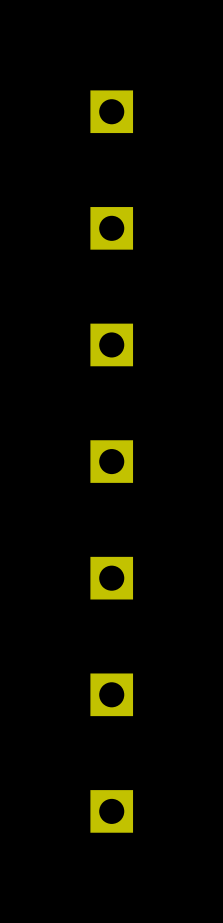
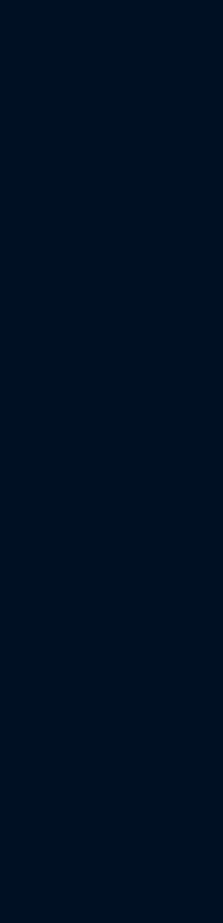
part: (111, 111) -> none
part: (111, 228) -> none
part: (111, 344) -> none
part: (111, 461) -> none
part: (111, 578) -> none
part: (111, 694) -> none
part: (111, 811) -> none

